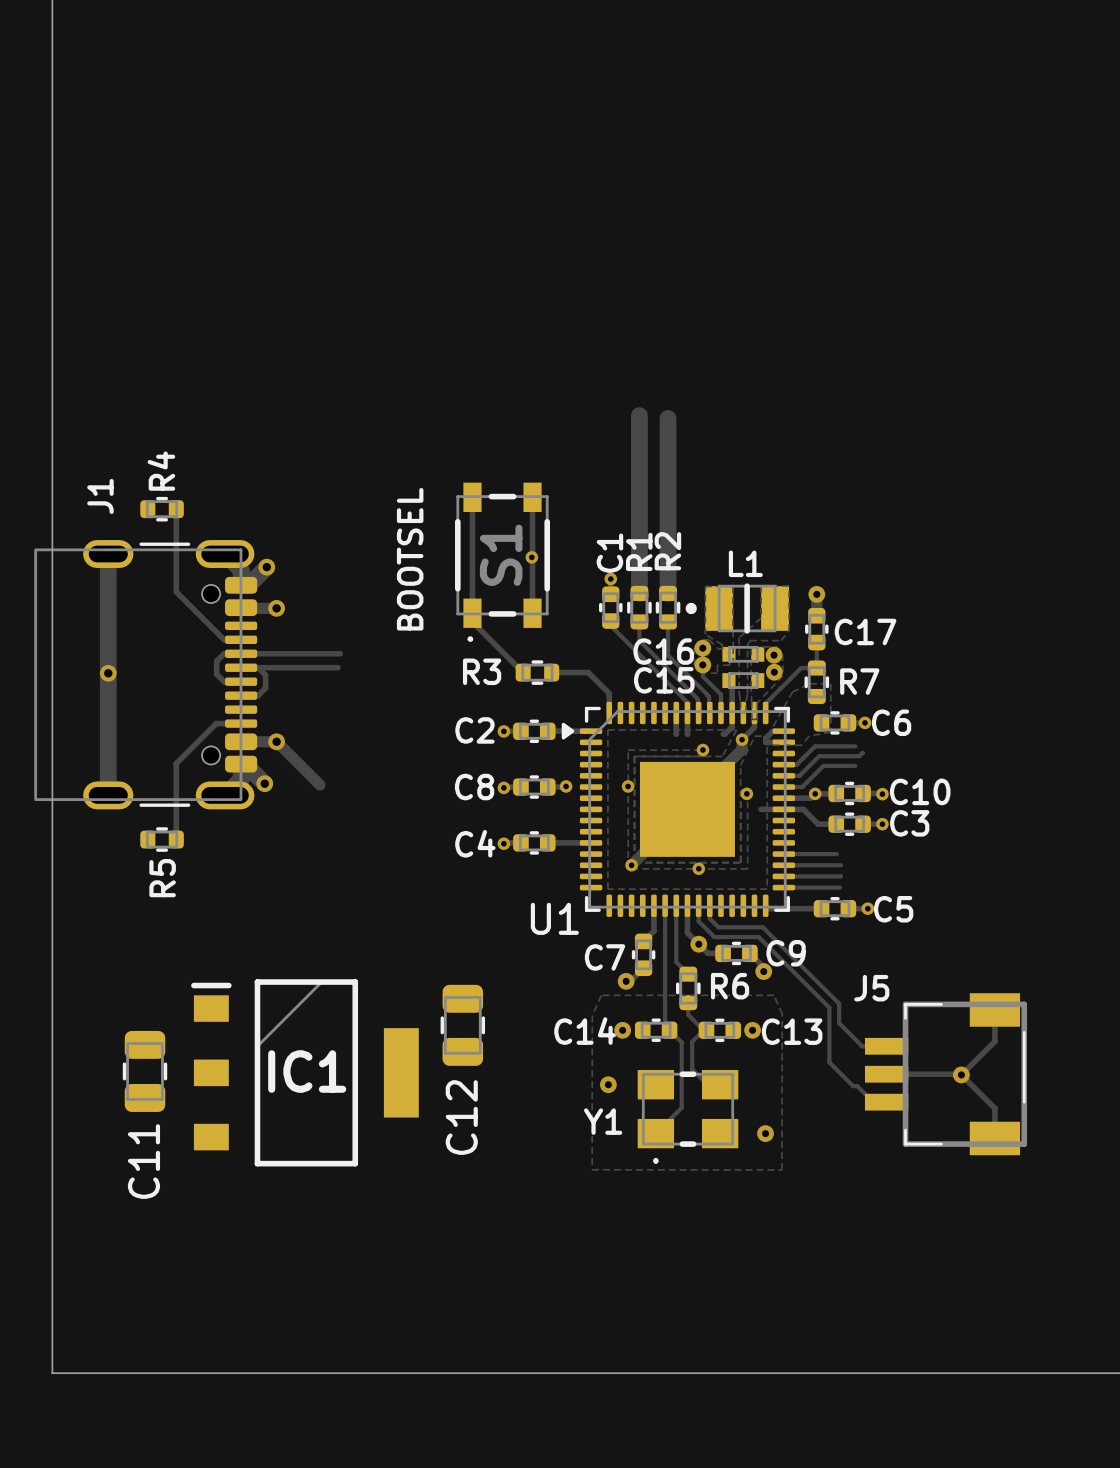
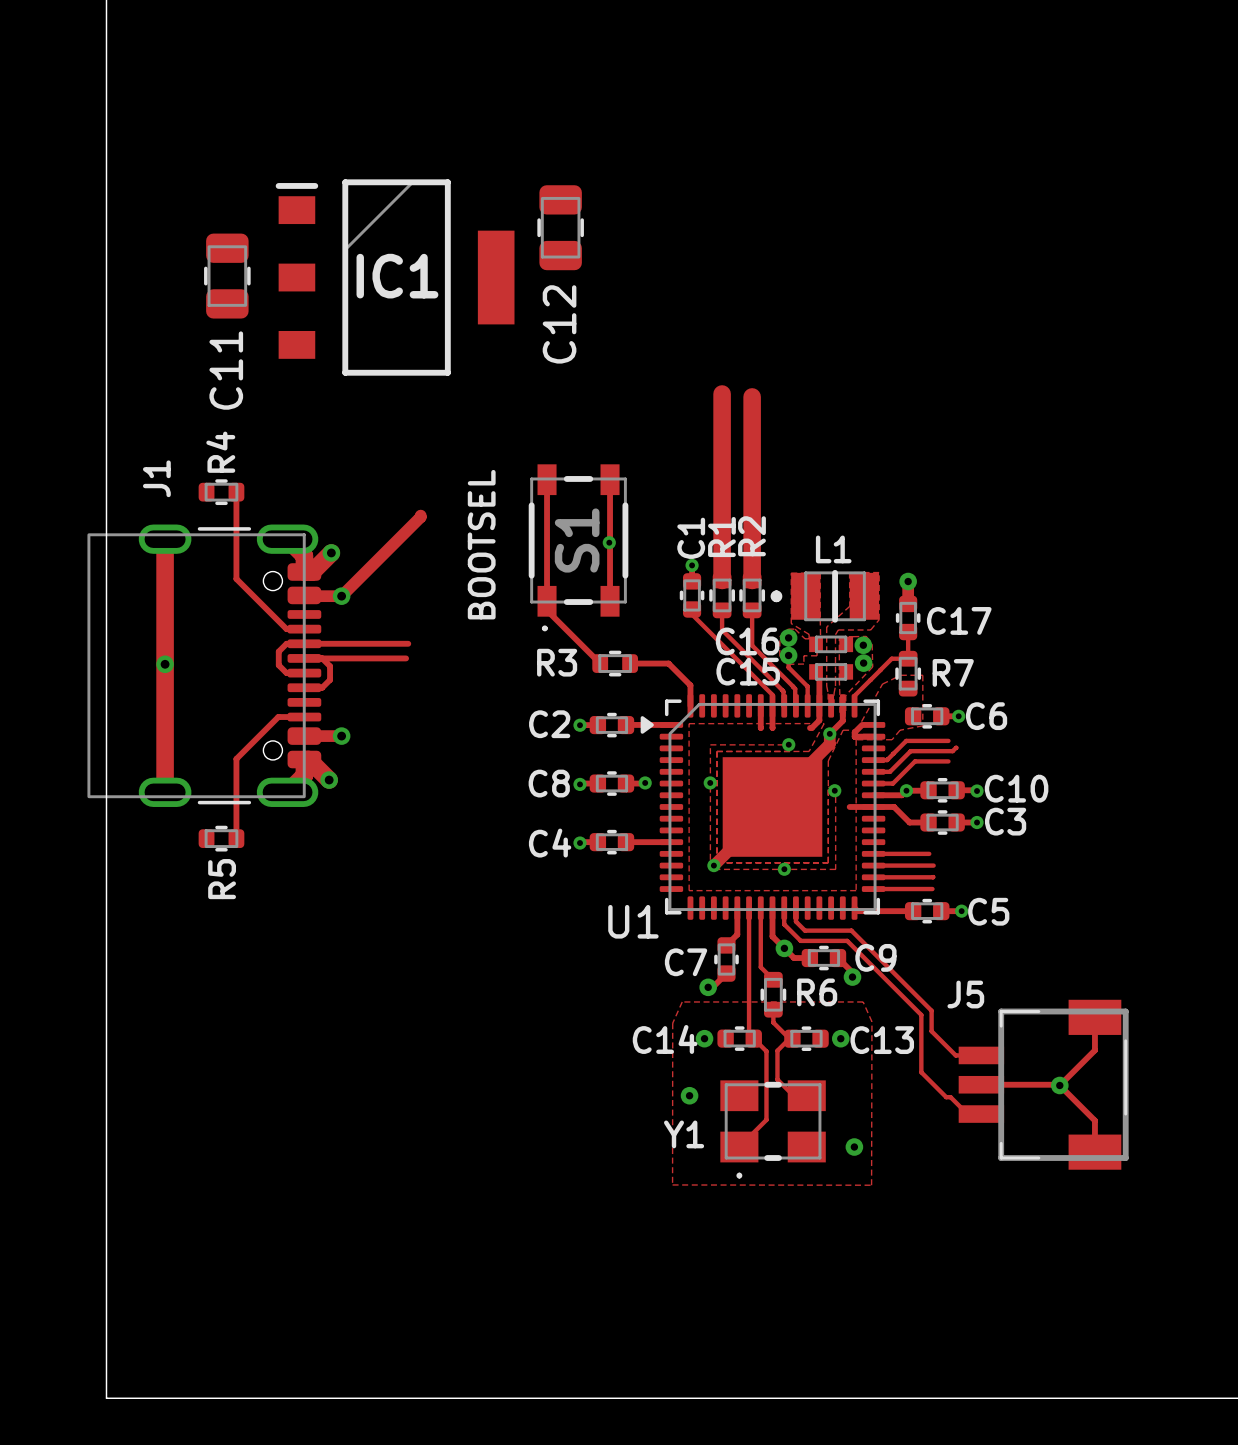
track: none -> (420, 515) (341, 596)
track: (276, 741) (320, 785) -> none
C12 position: (462, 1025) -> (560, 227)
C11 position: (145, 1071) -> (227, 276)
IC1 position: (304, 1072) -> (395, 277)

